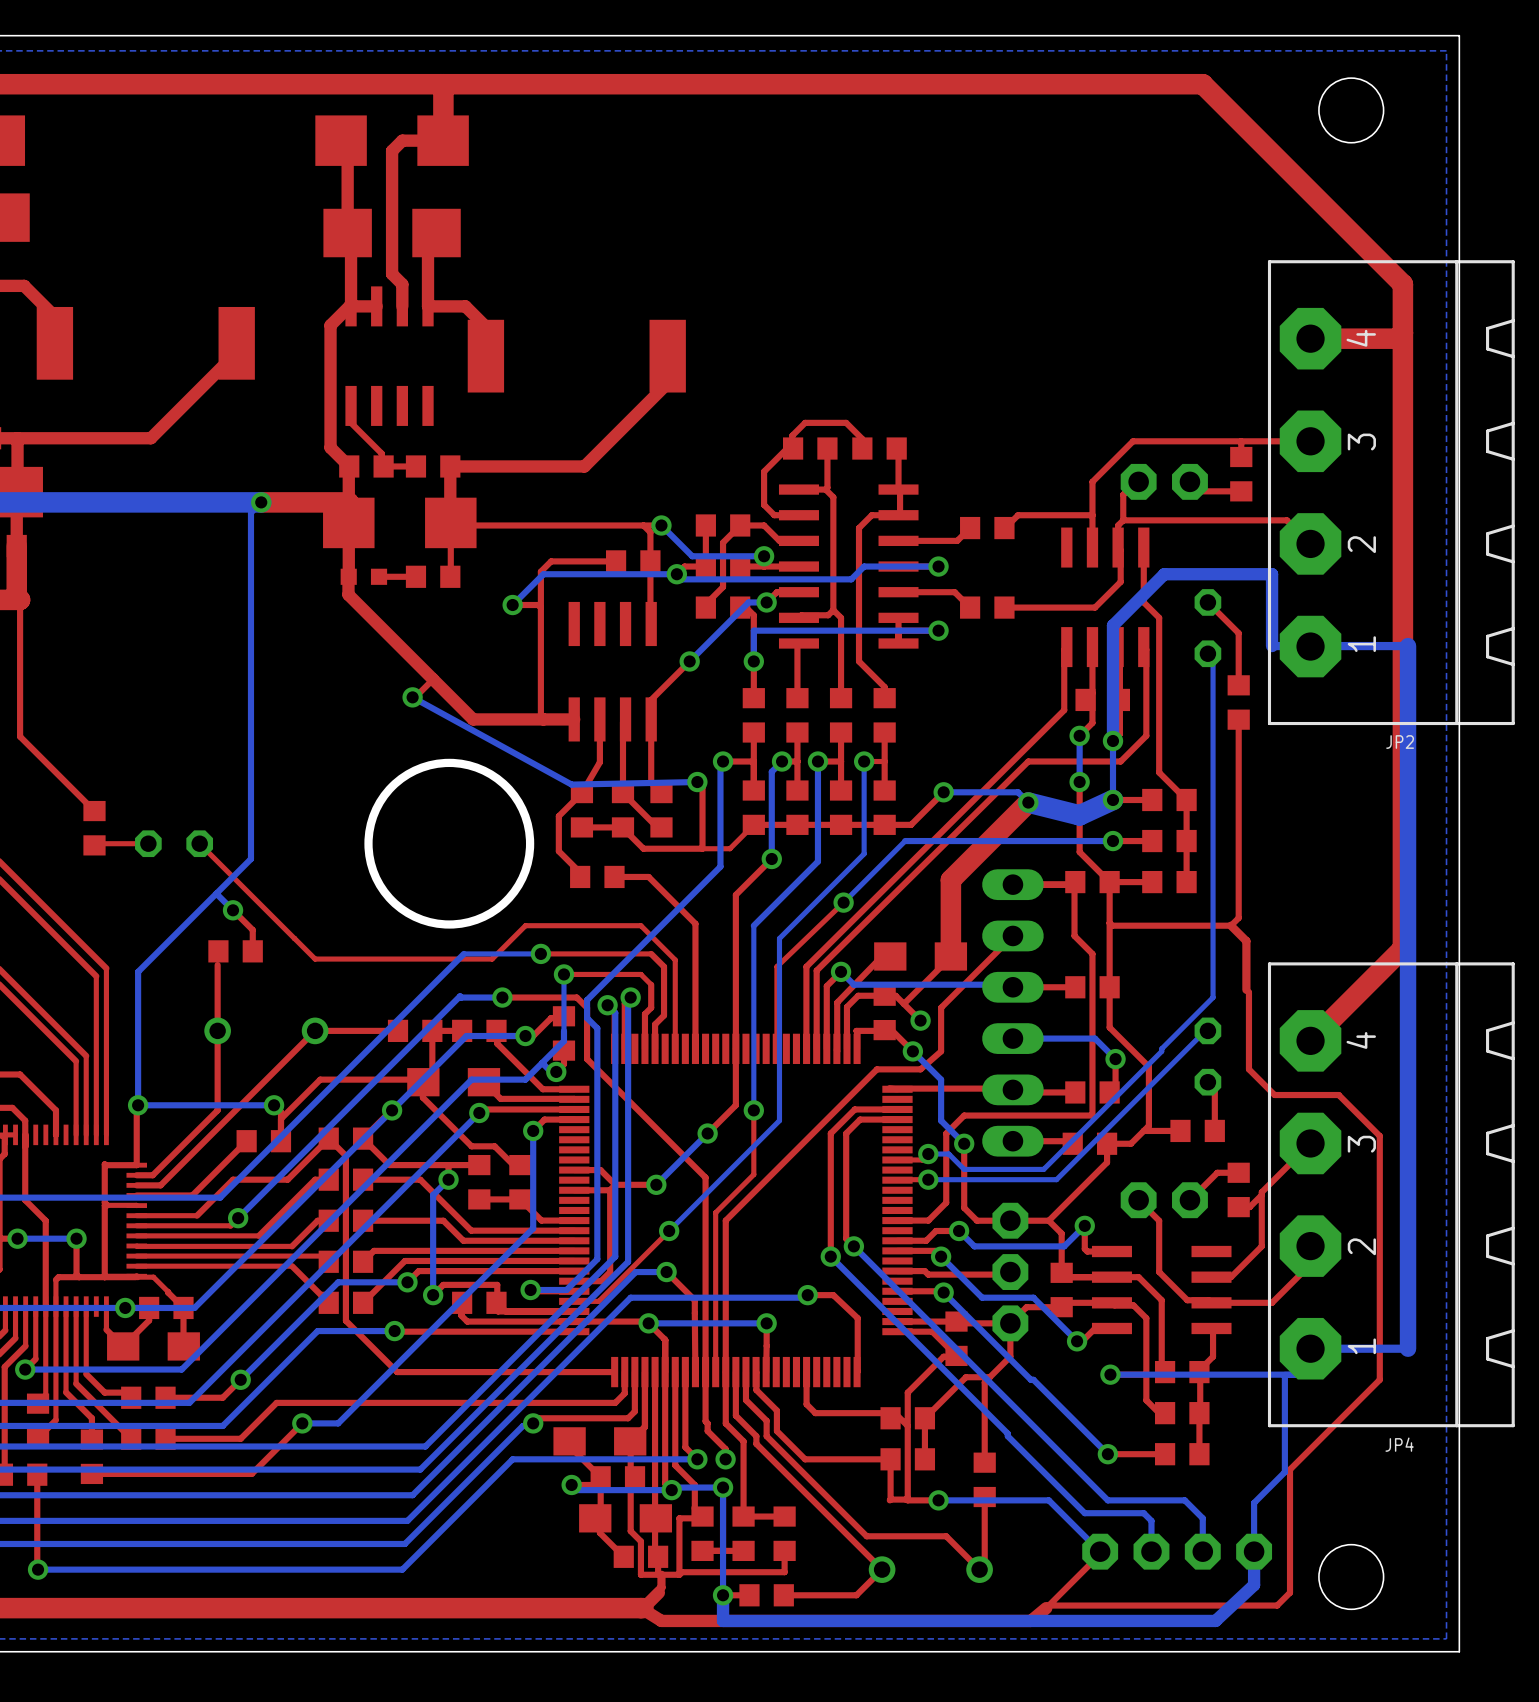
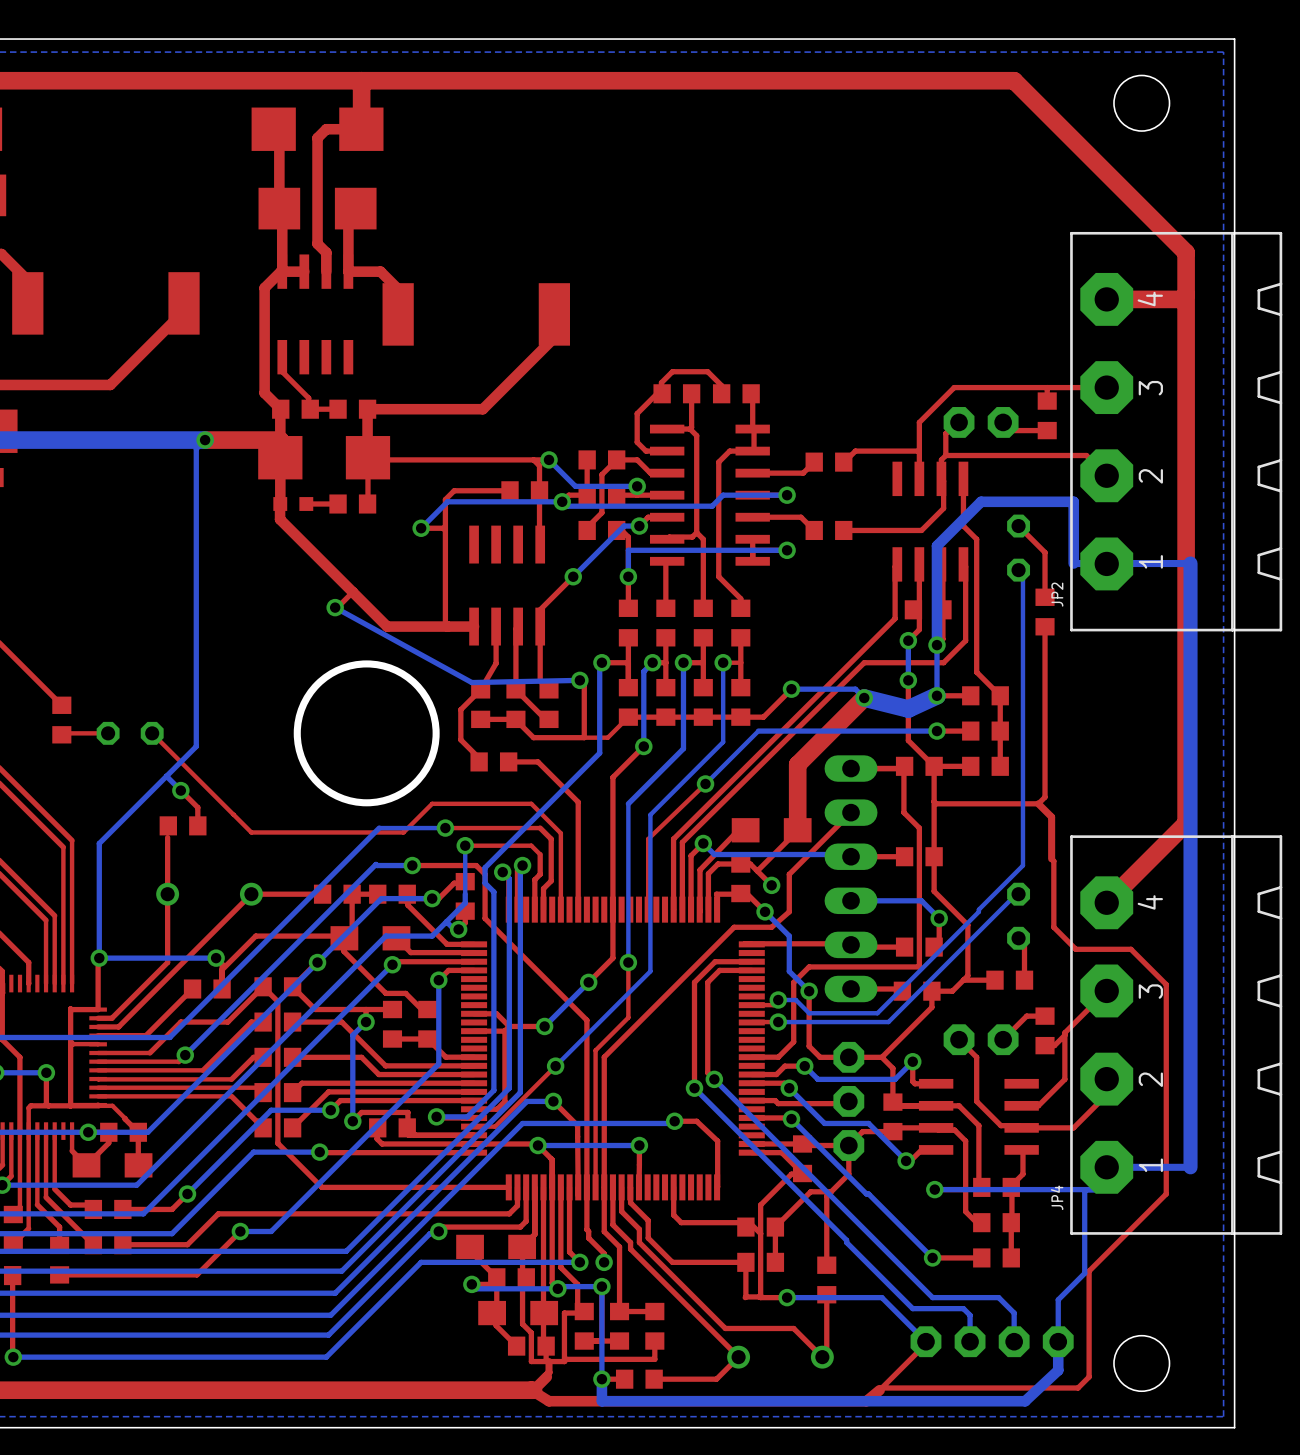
JP2 name rotation: 0° (1400, 742) -> 90° counterclockwise (1057, 594)
JP2 name position: JP2 (1400, 742) -> JP2 (1057, 594)
JP4 name rotation: 0° (1399, 1444) -> 90° counterclockwise (1057, 1197)
JP4 name position: JP4 (1399, 1444) -> JP4 (1057, 1197)

